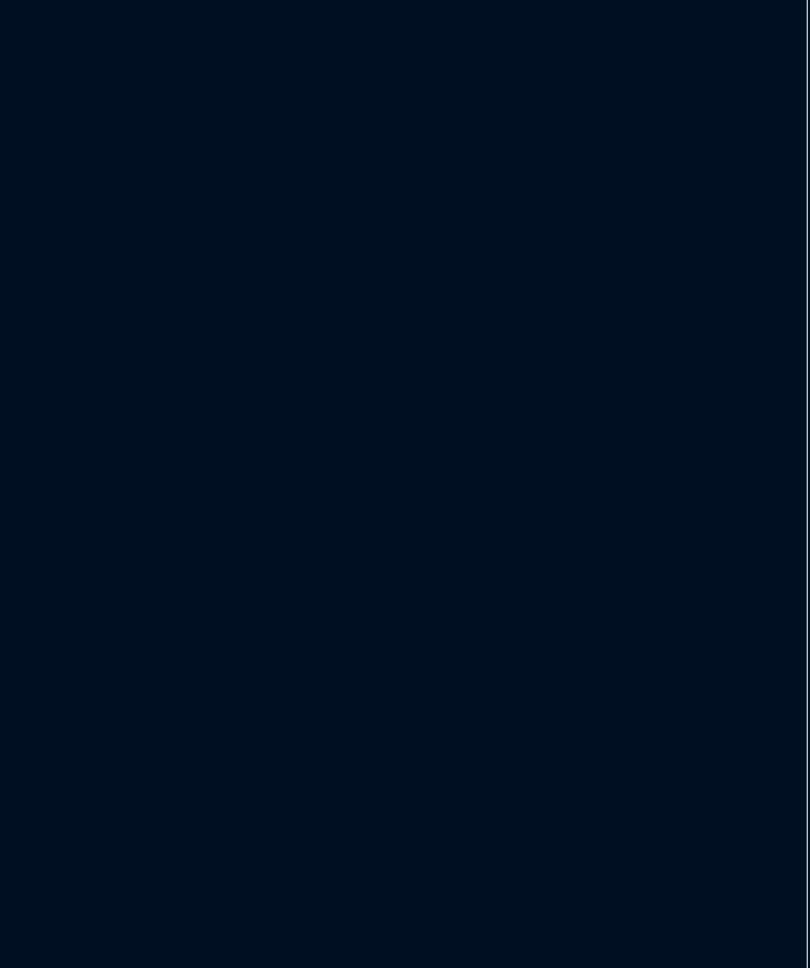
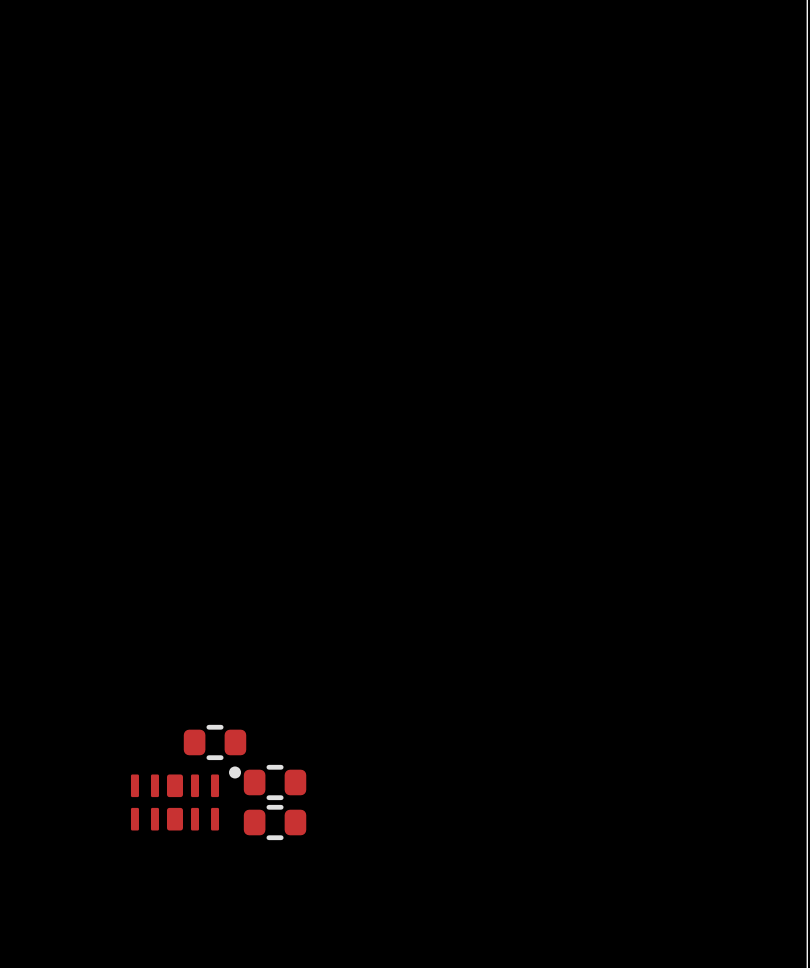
part: none -> (215, 742)
part: none -> (275, 782)
part: none -> (185, 798)
part: none -> (275, 822)

